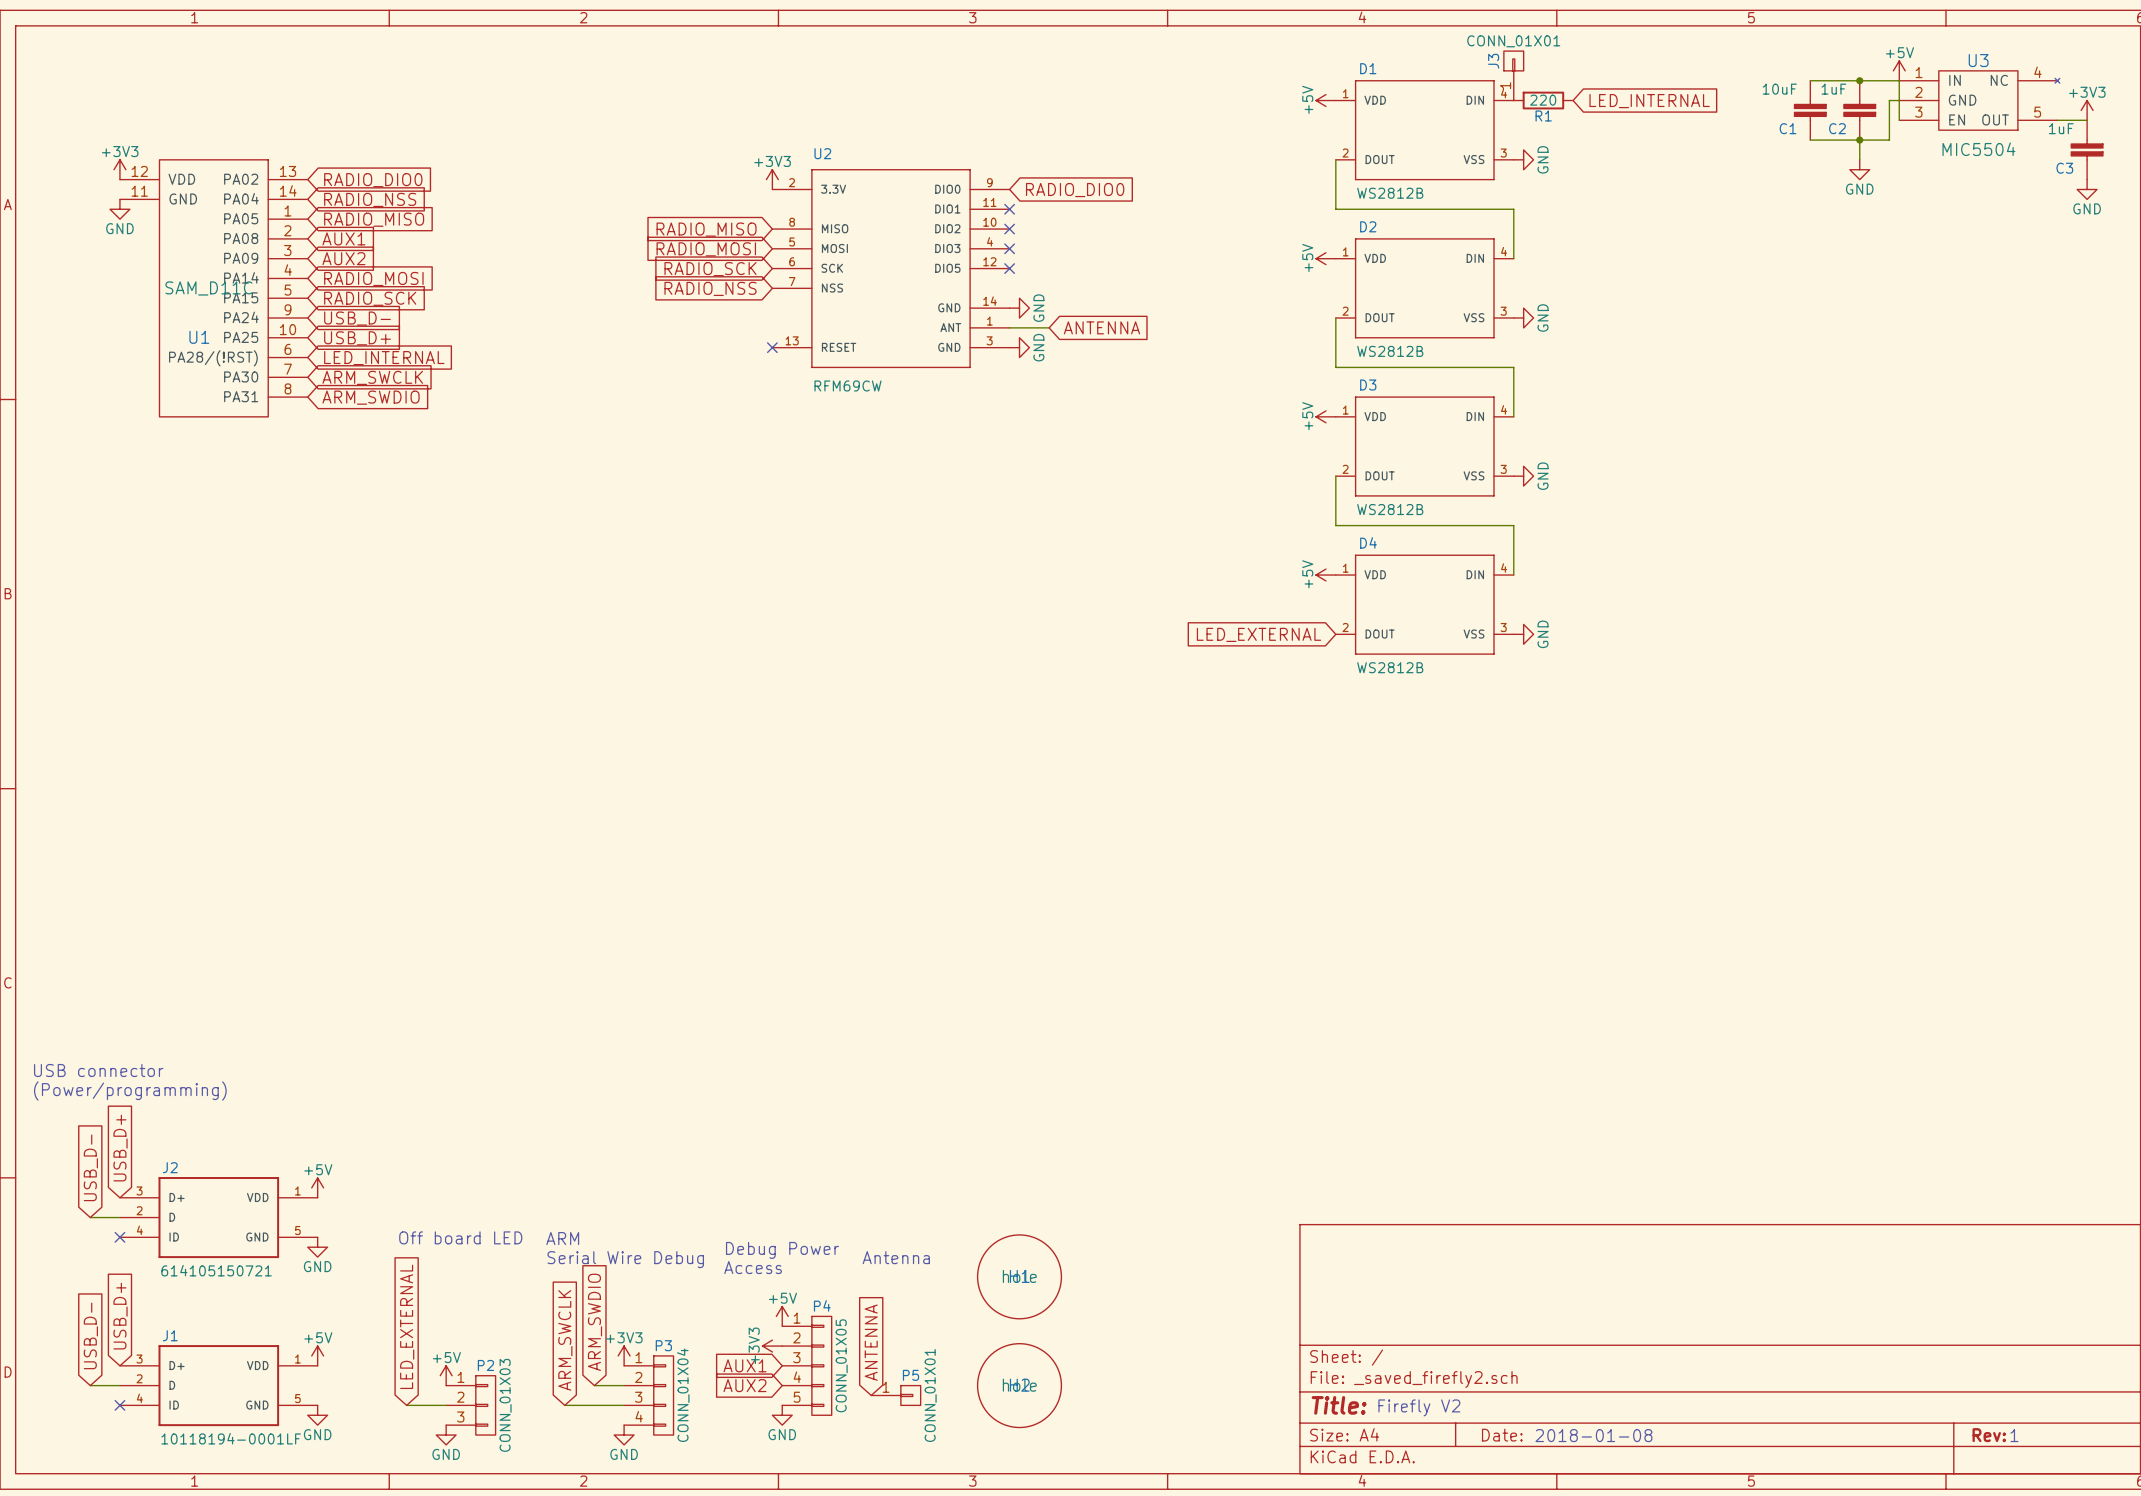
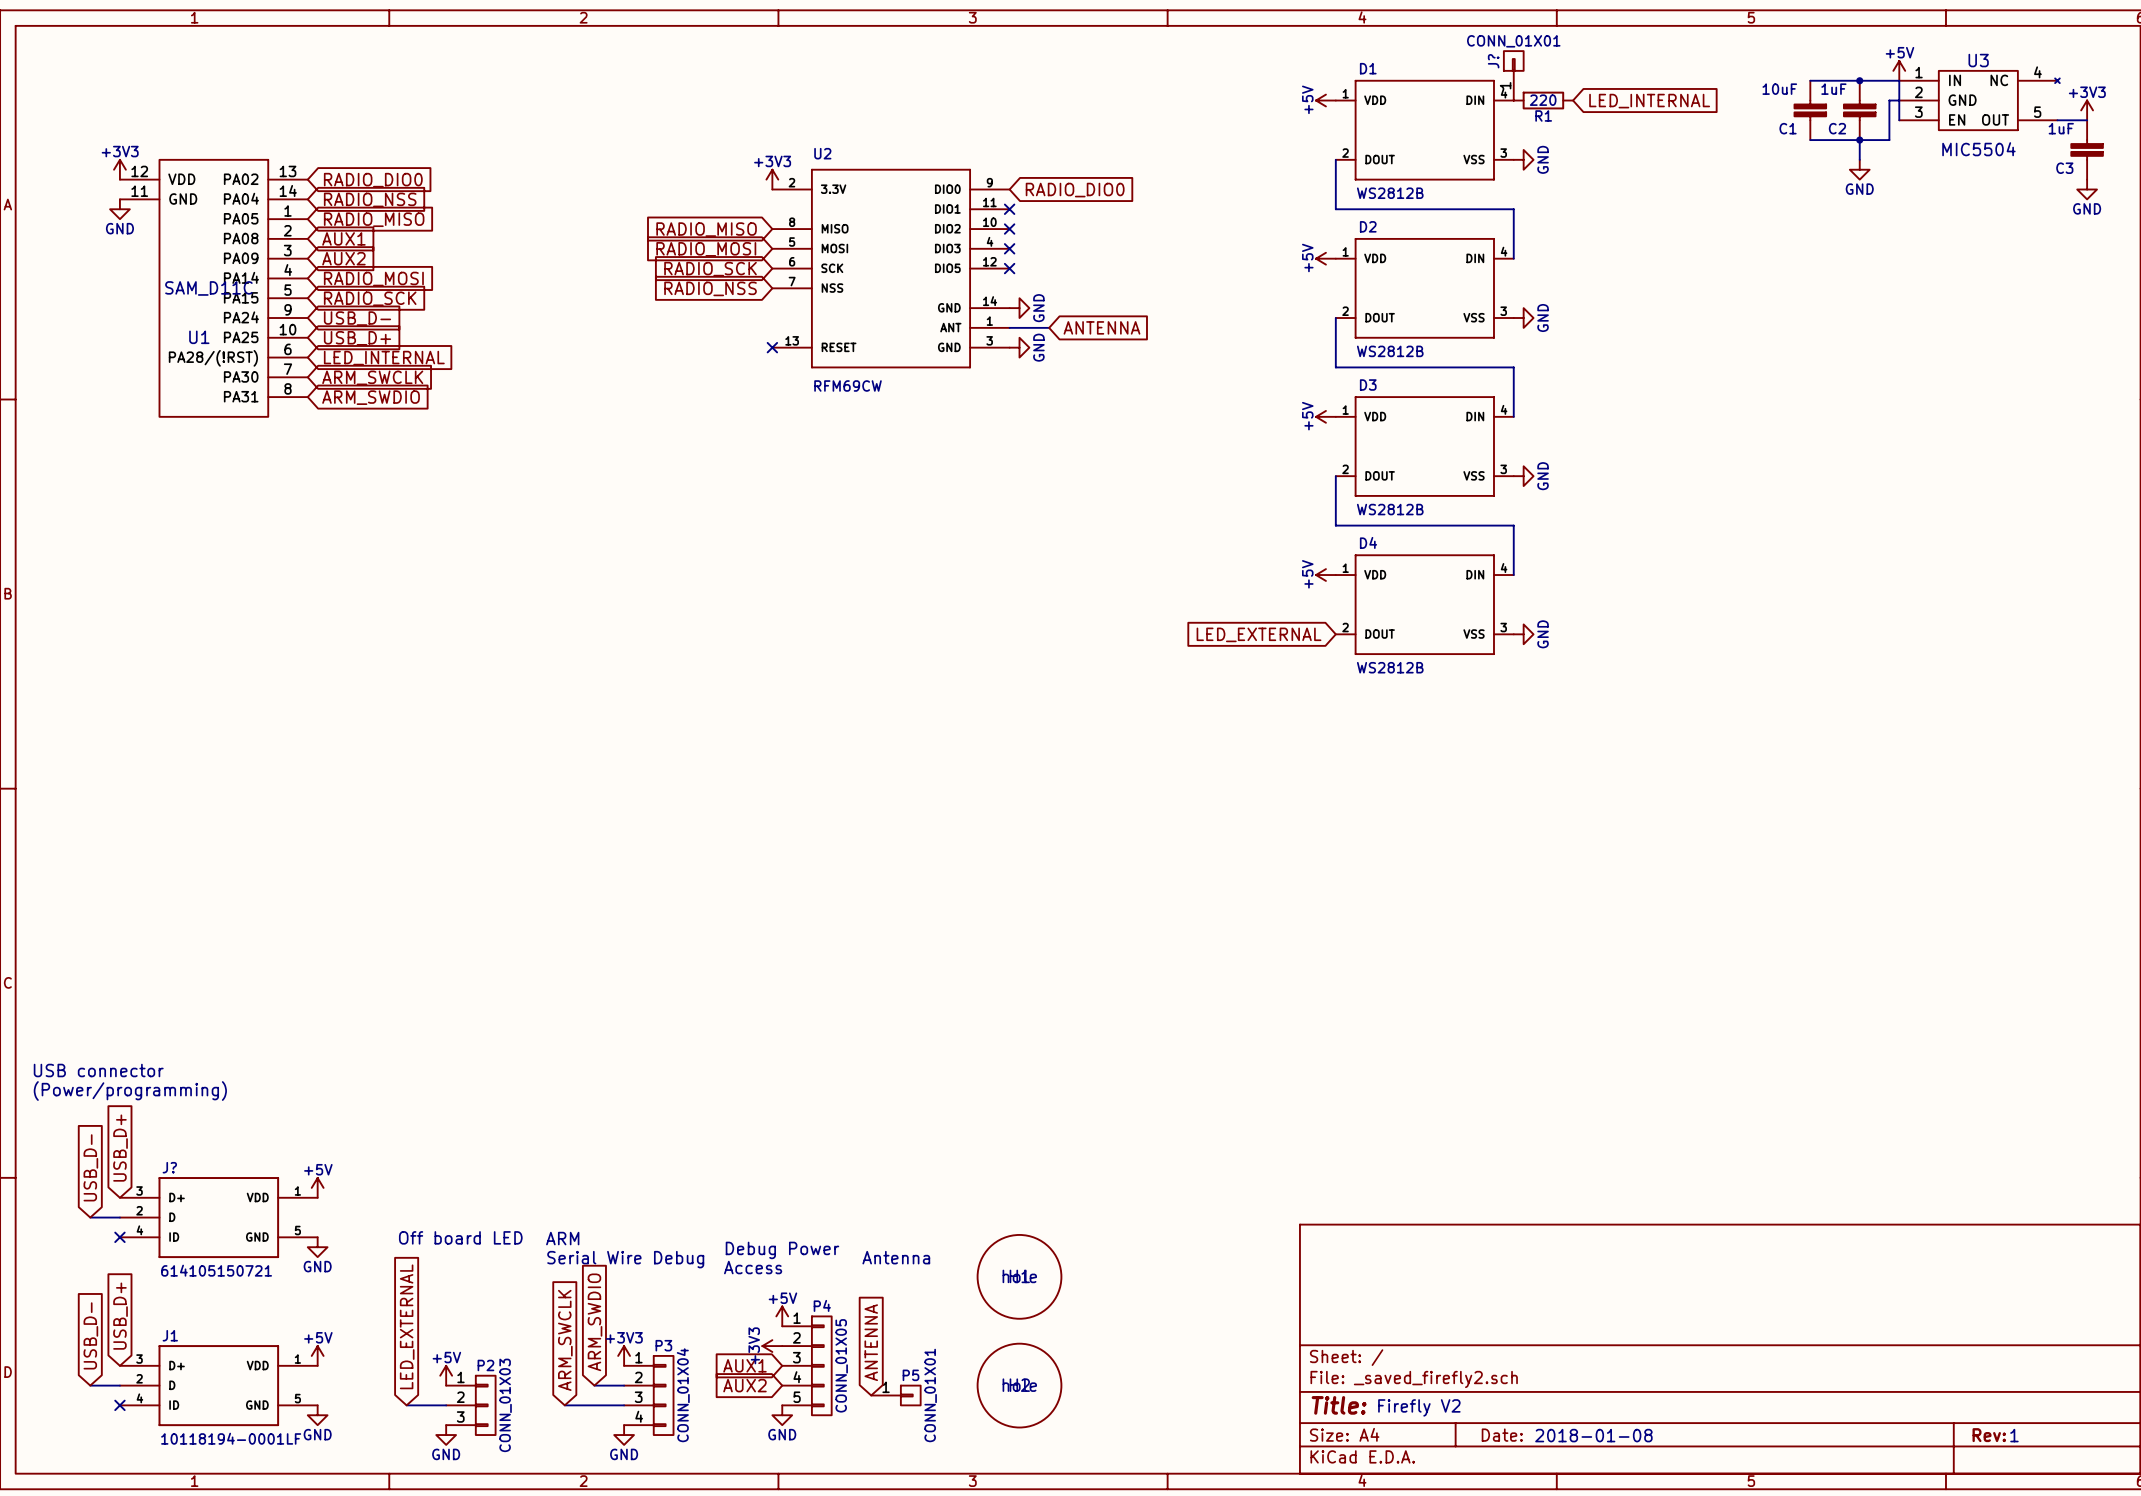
J3 name: J3 (1493, 61) -> J? (1493, 61)
J2 name: J2 (170, 1167) -> J? (169, 1167)

